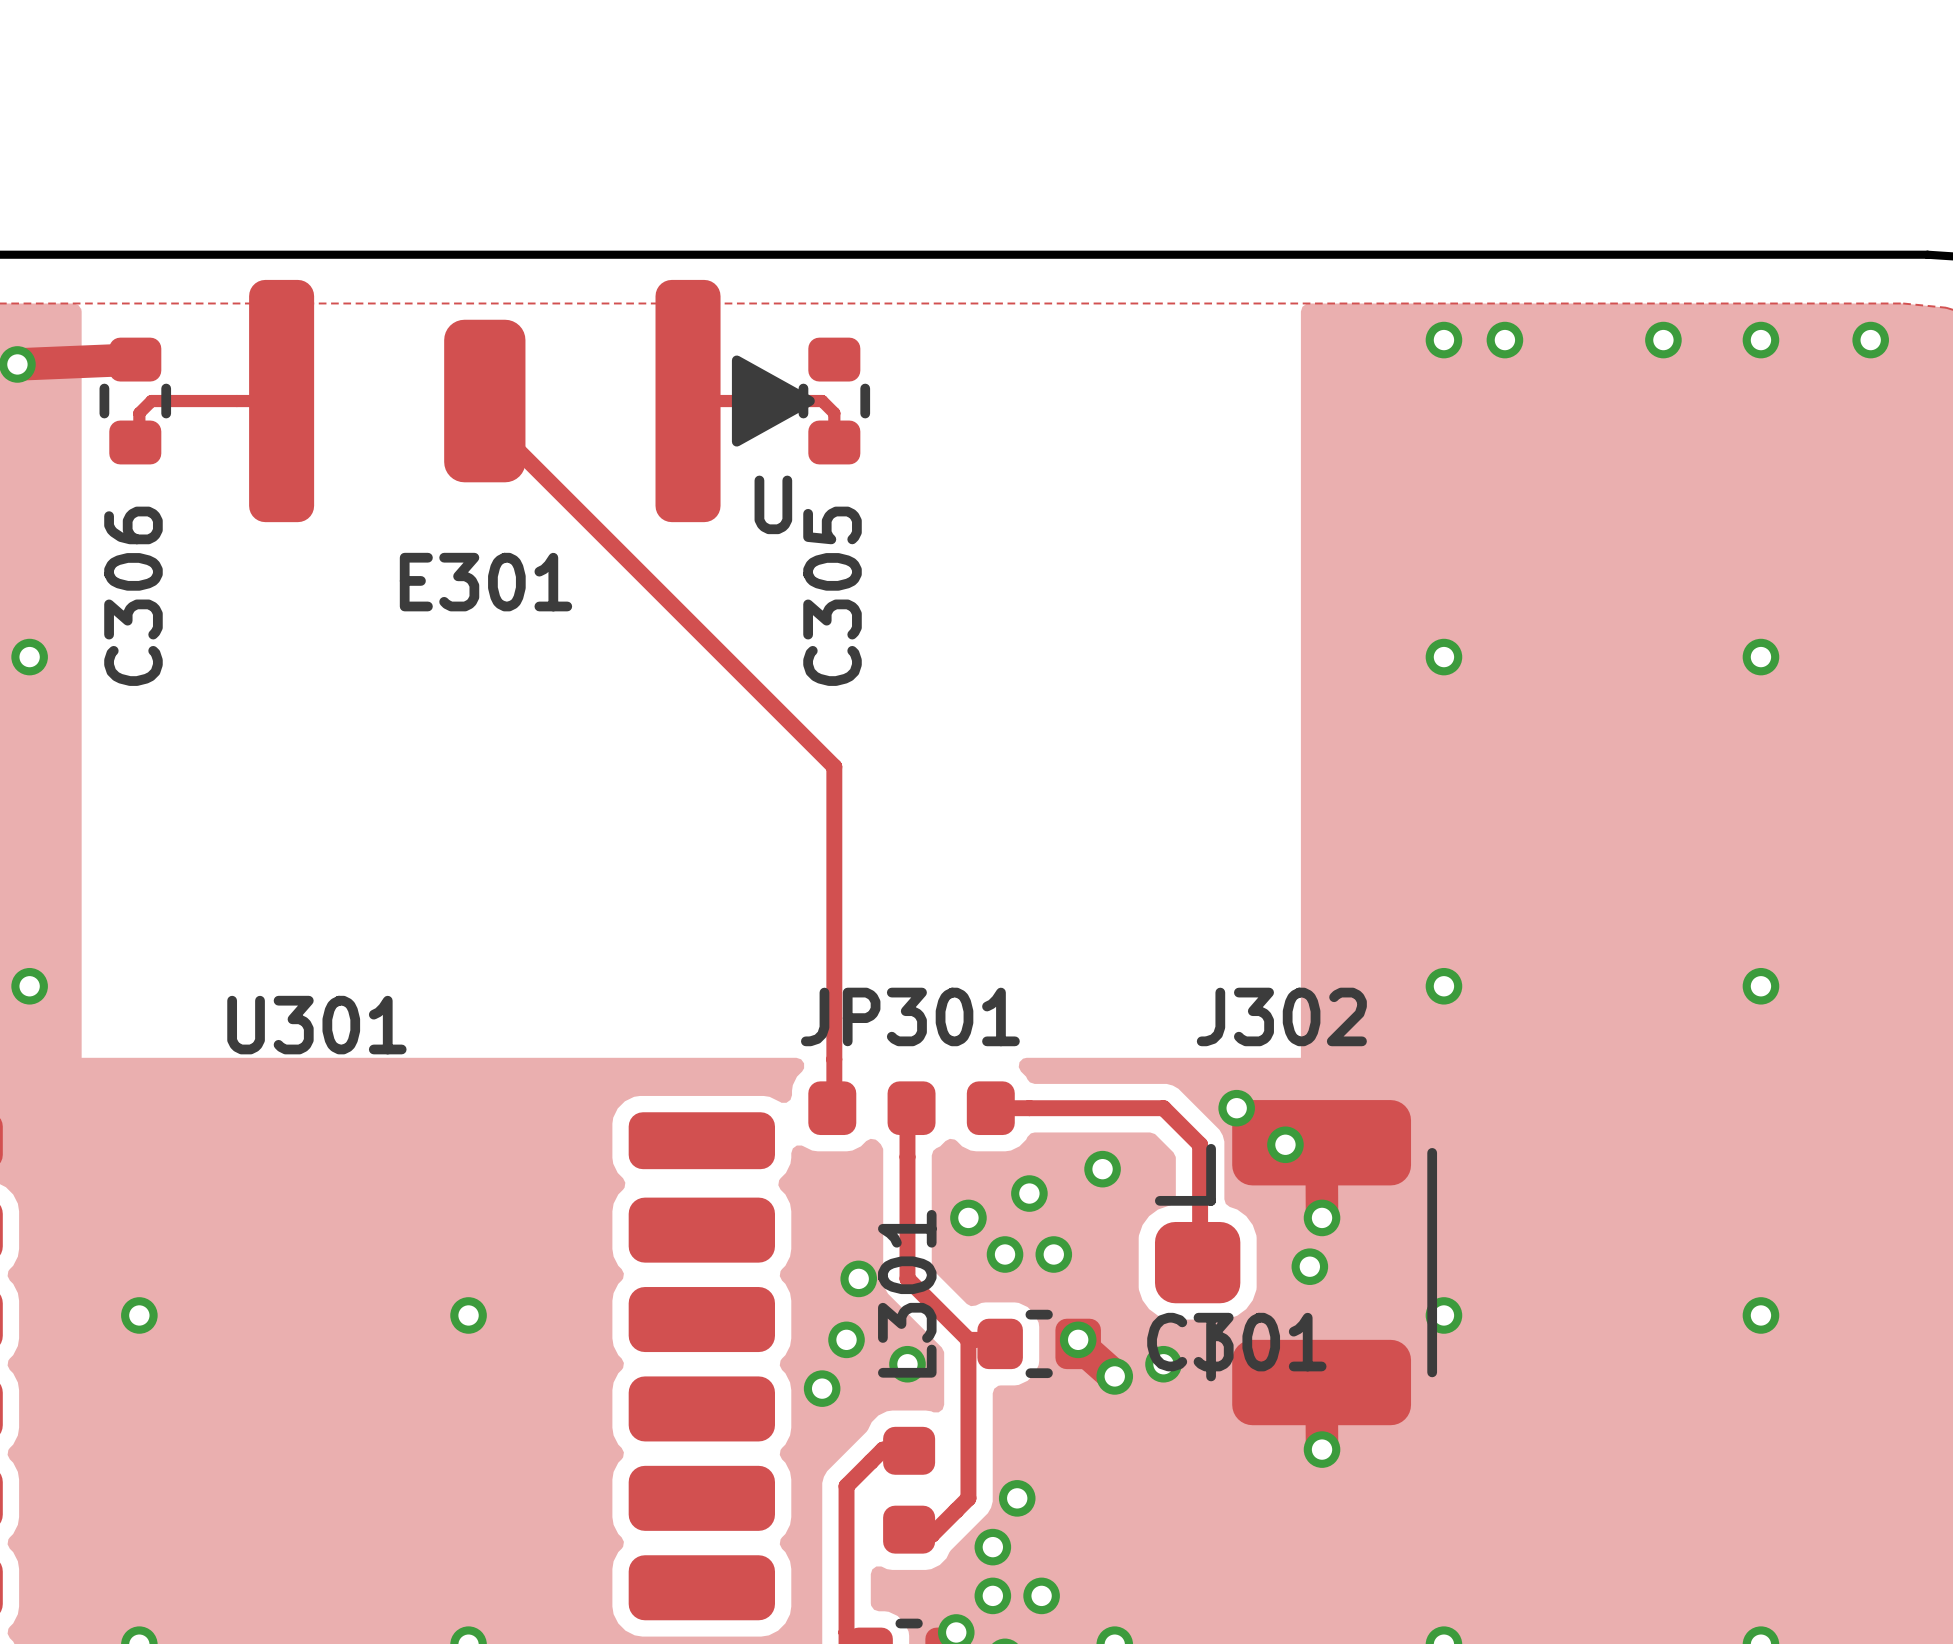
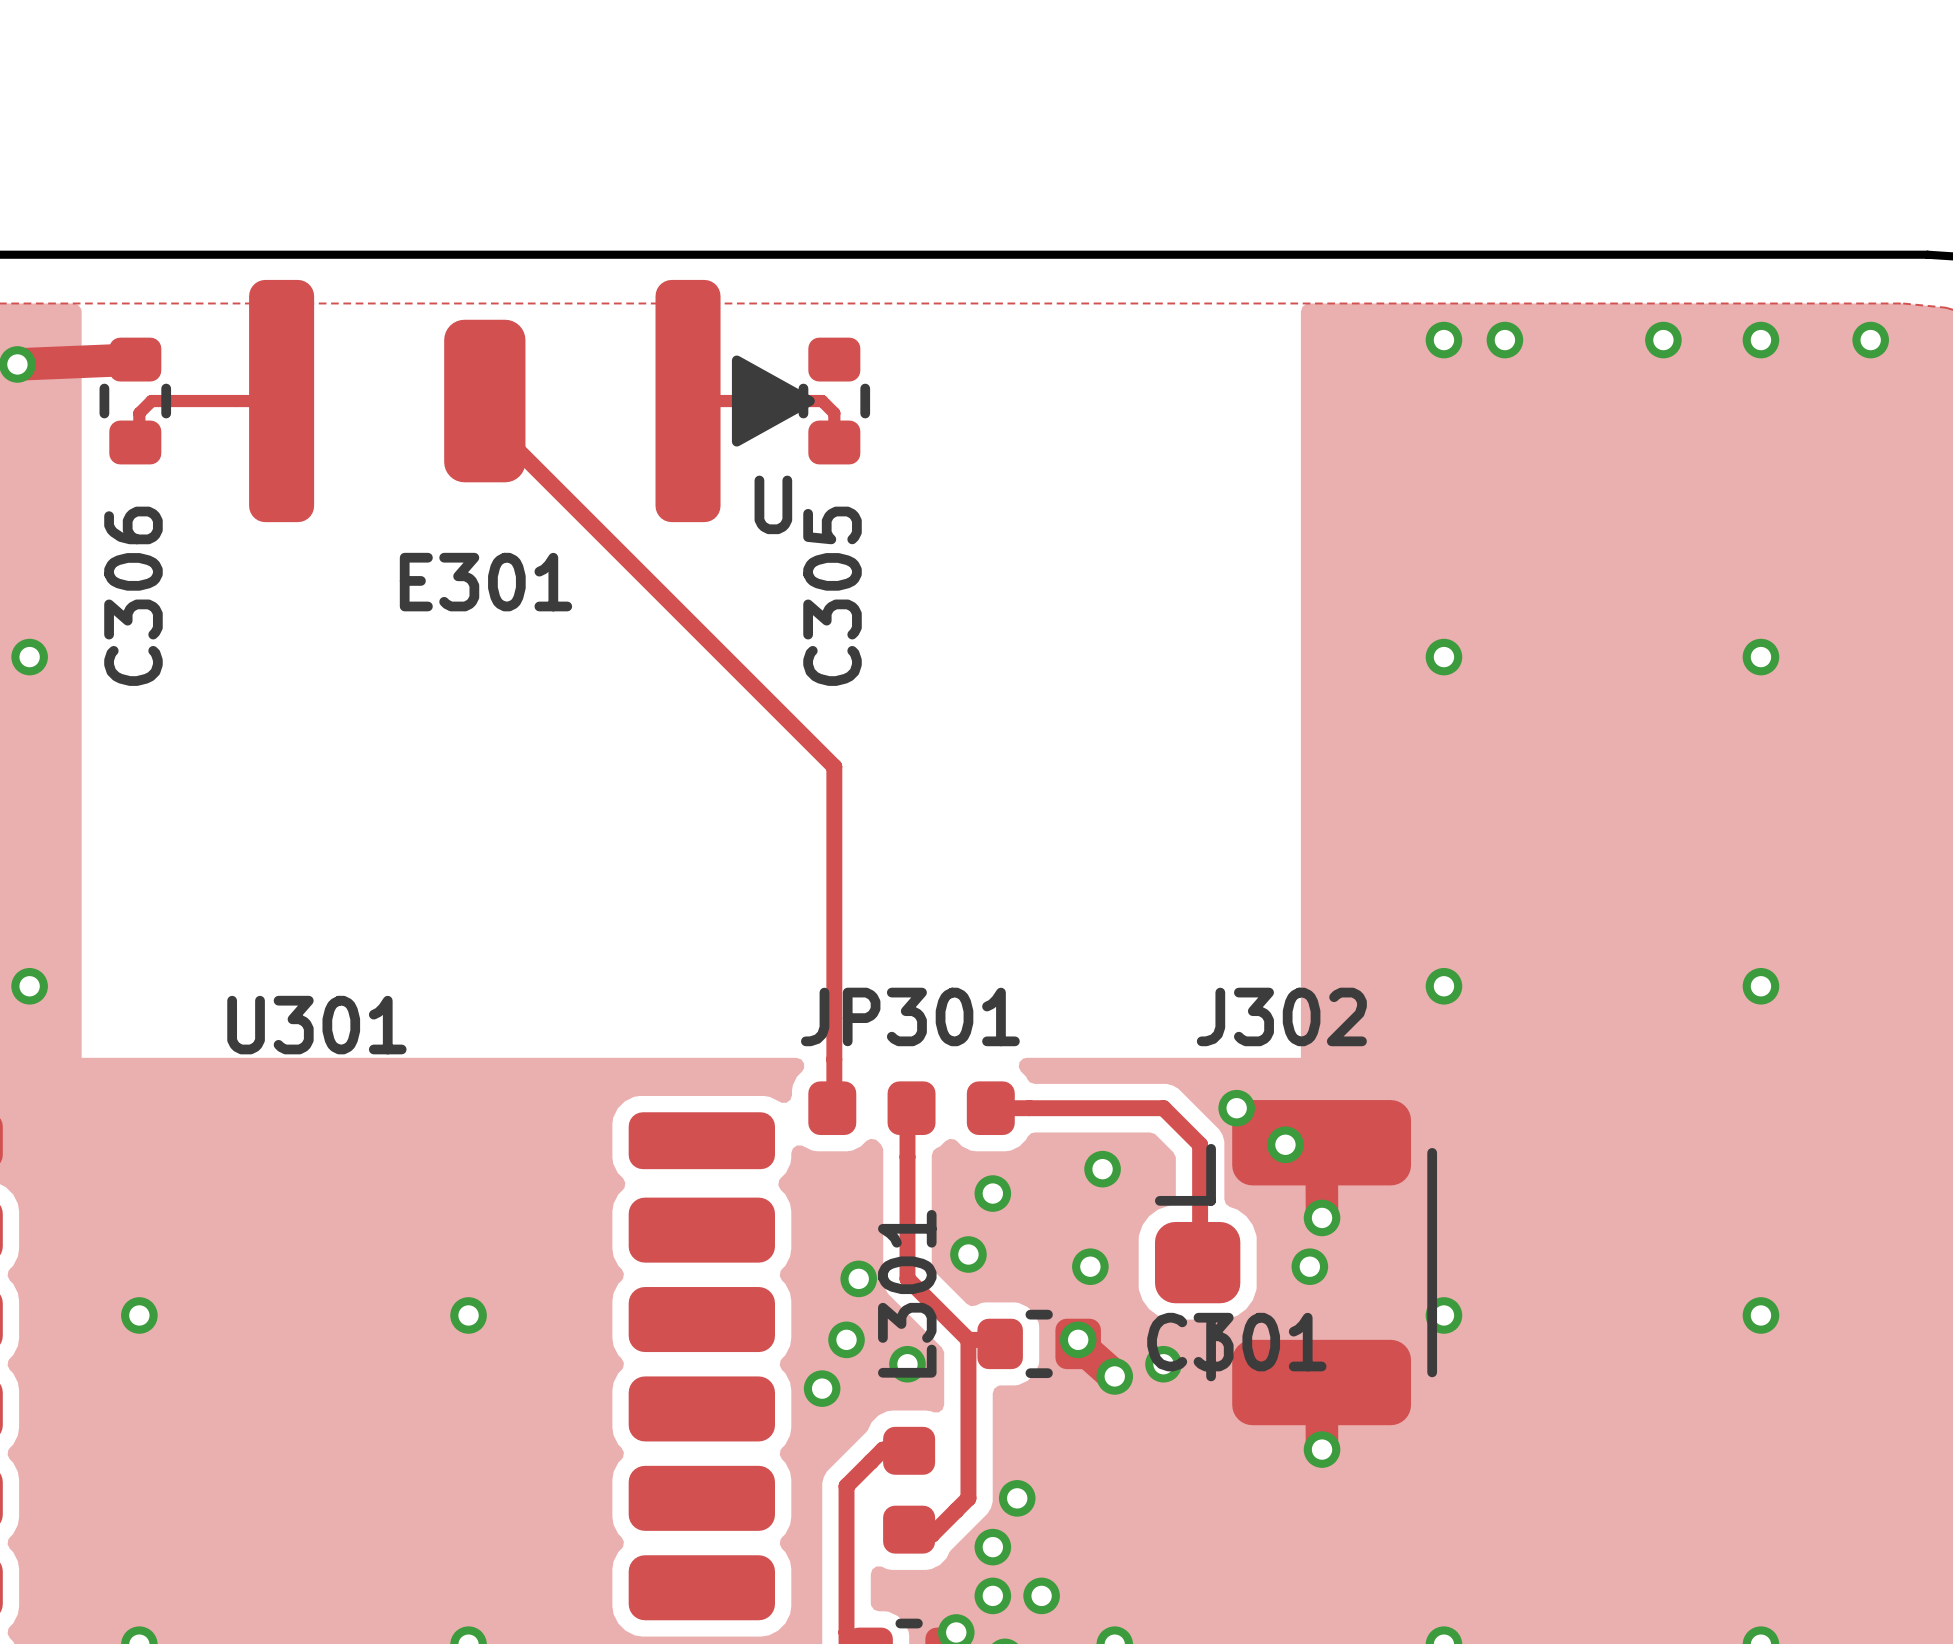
via: none -> (992, 1193)
via: (1029, 1193) -> none
via: (968, 1217) -> none
via: none -> (968, 1254)
via: (1005, 1254) -> none
via position: (1053, 1254) -> (1090, 1266)

